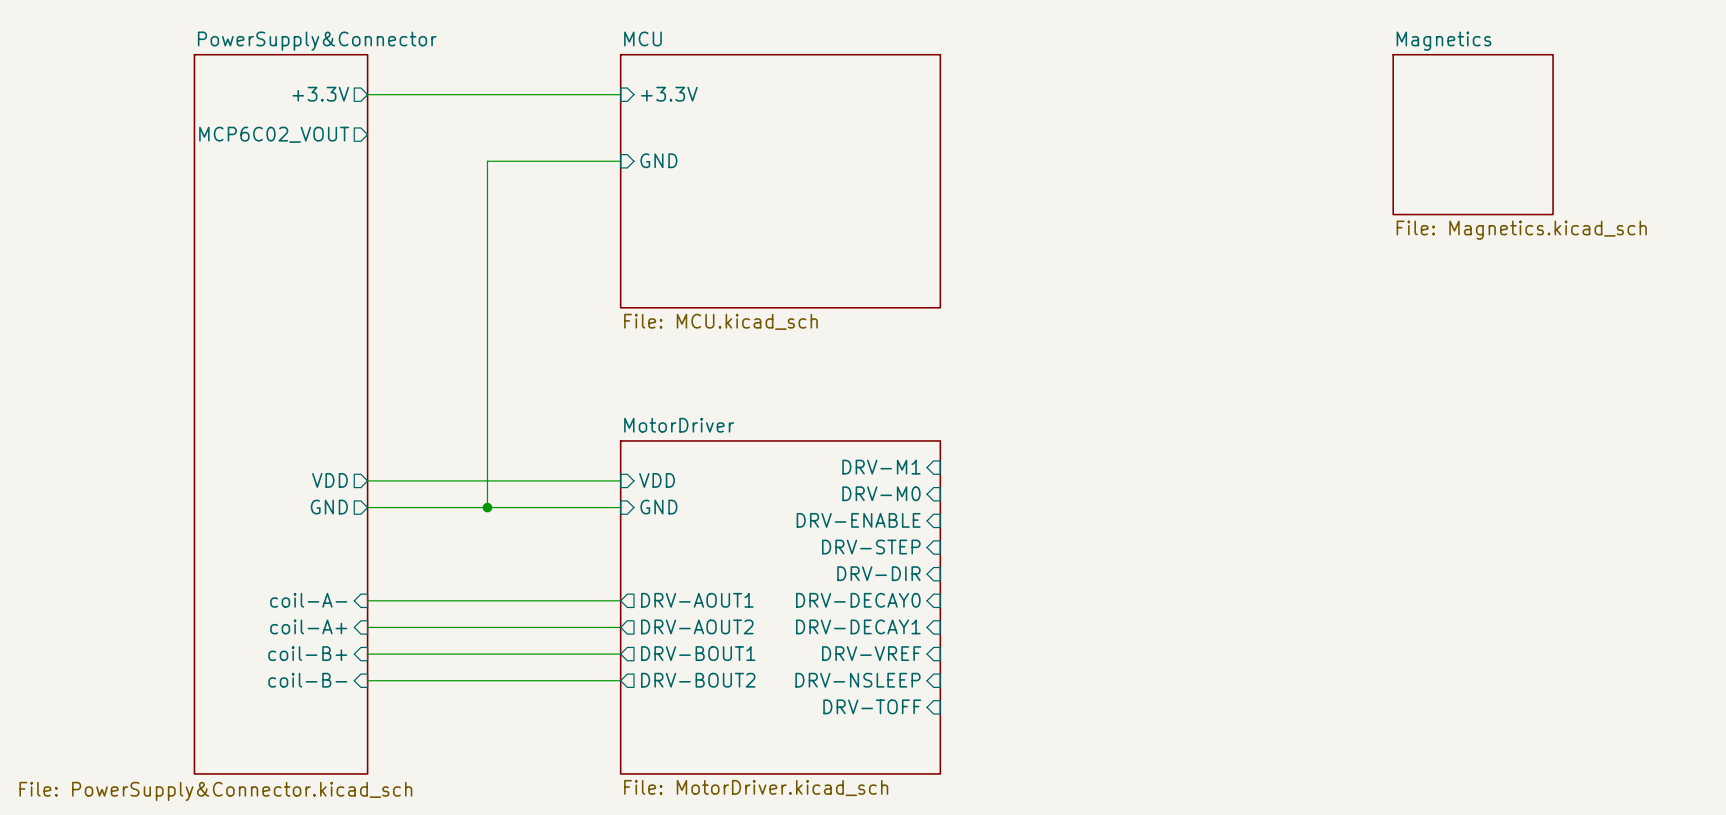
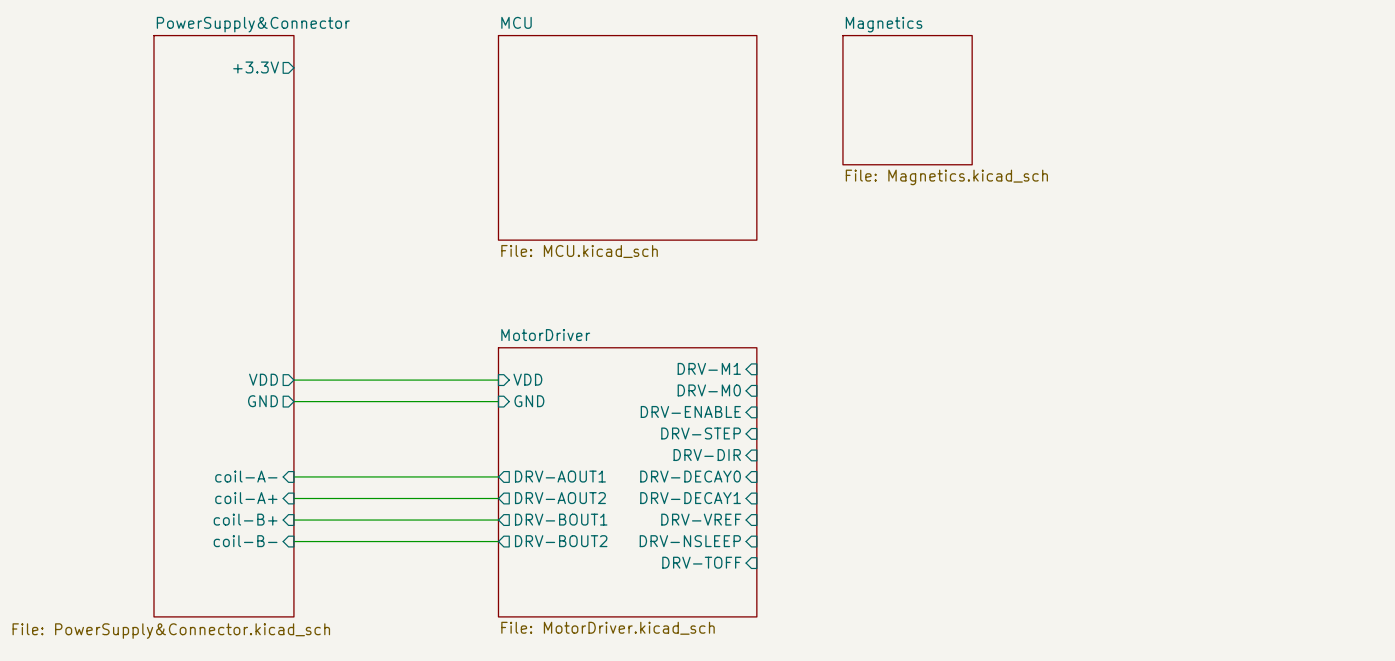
wire: (367, 94) (620, 94) -> none
sheet pin: +3.3V (669, 94) -> none
sheet pin: MCP6C02_VOUT (274, 134) -> none
sheet Magnetics: none -> File: Magnetics.kicad_sch (907, 100)
sheet Magnetics: File: Magnetics.kicad_sch (1473, 134) -> none
sheet pin: GND (658, 160) -> none
wire: (620, 161) (487, 161) (487, 507) -> none
junction: (487, 507) -> none

